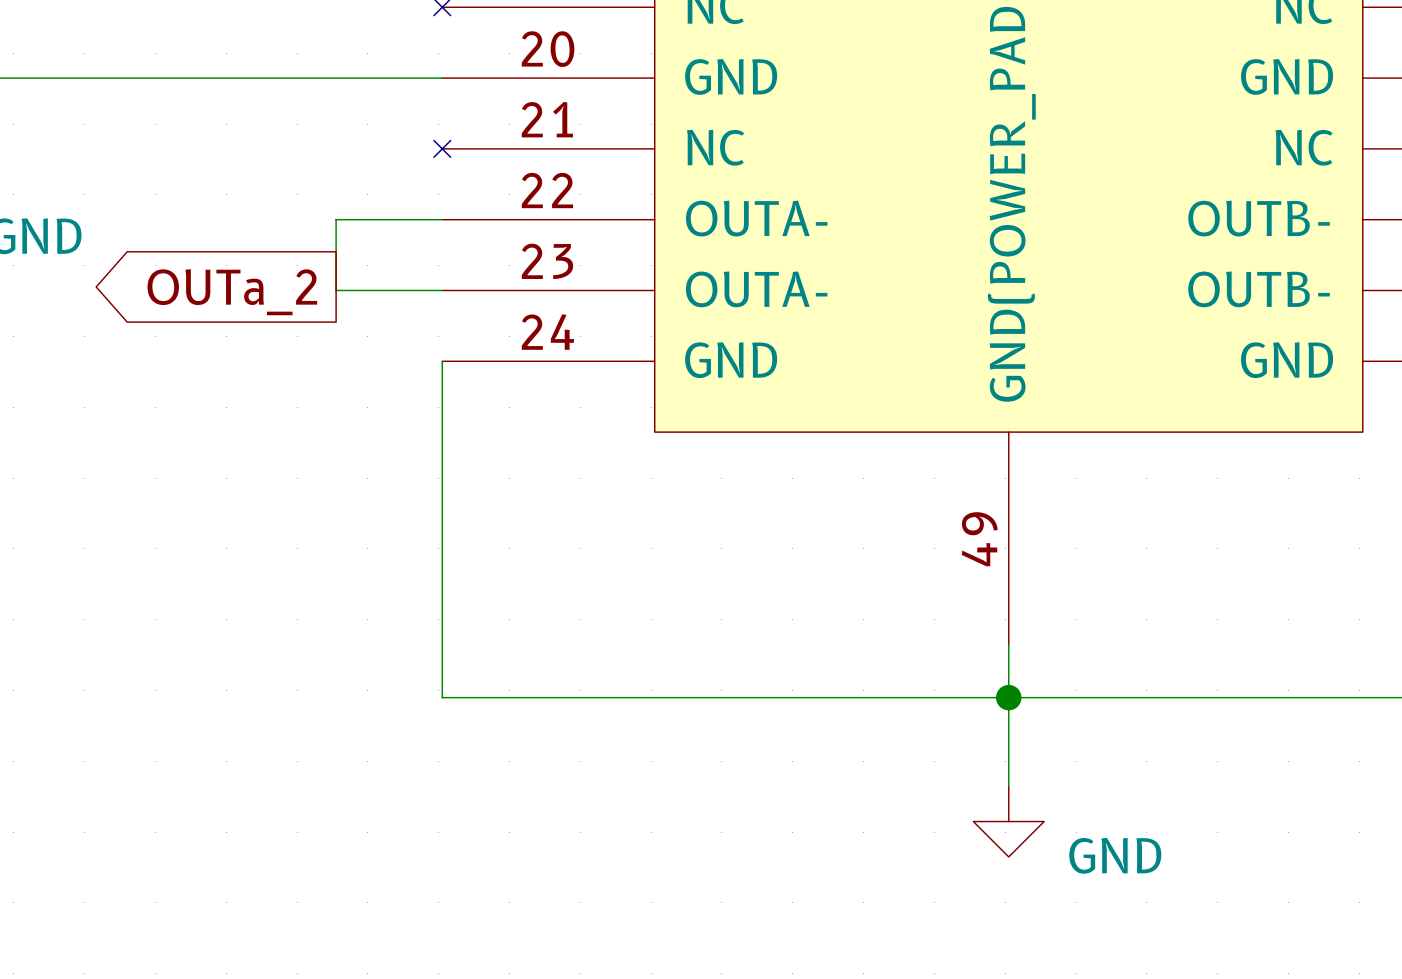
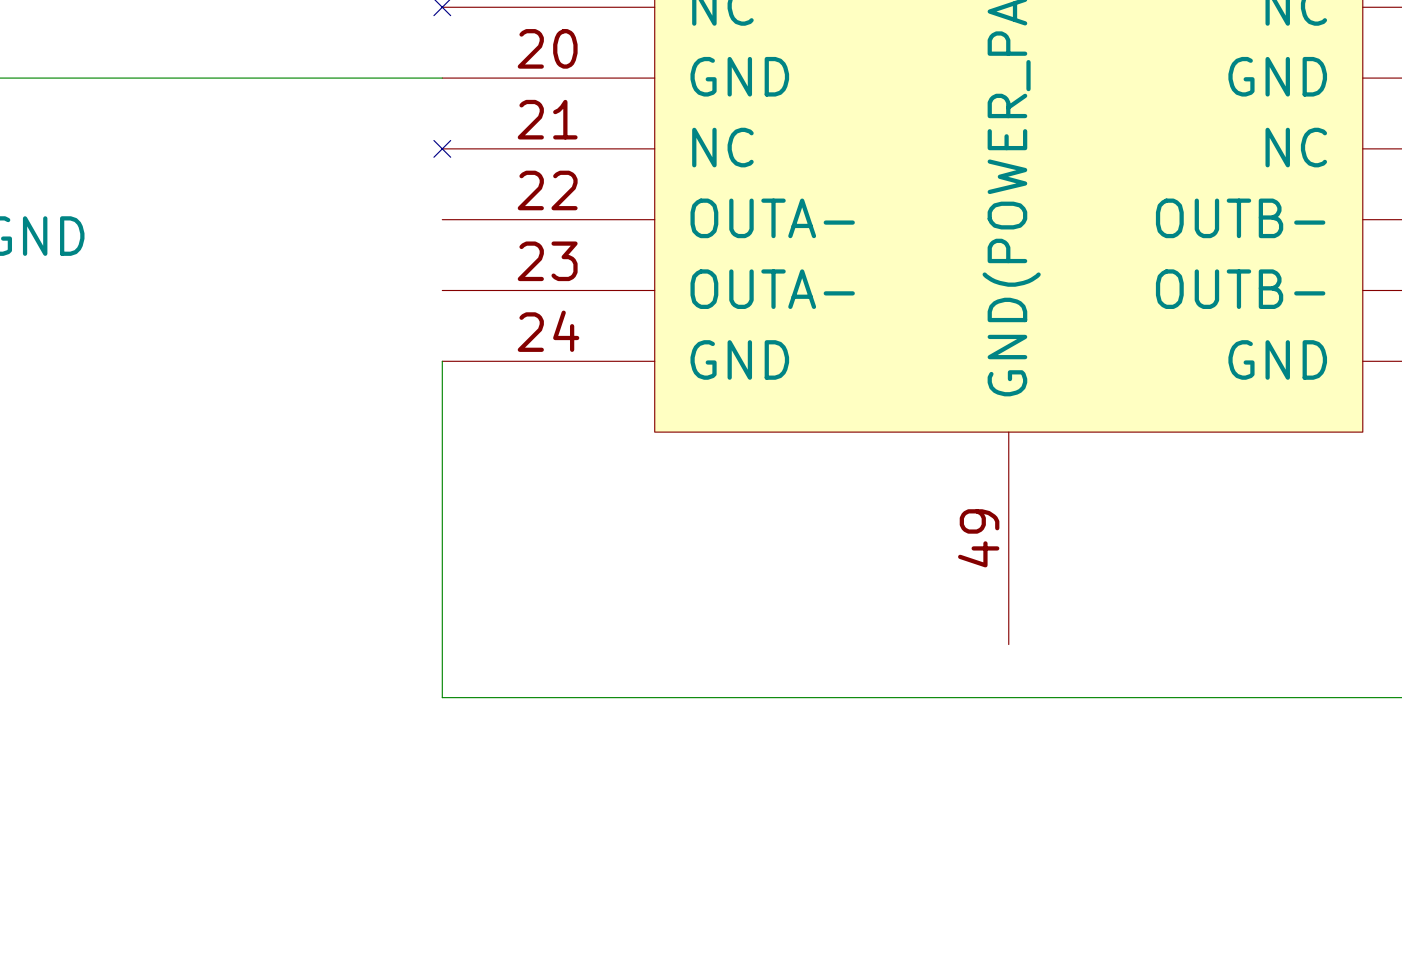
wire: (442, 219) (336, 219) (336, 290) (442, 290) -> none
global label: OUTa_2 (232, 292) -> none
wire: (1008, 644) (1008, 786) -> none
junction: (1008, 697) -> none
power symbol: GND (1008, 821) -> none

